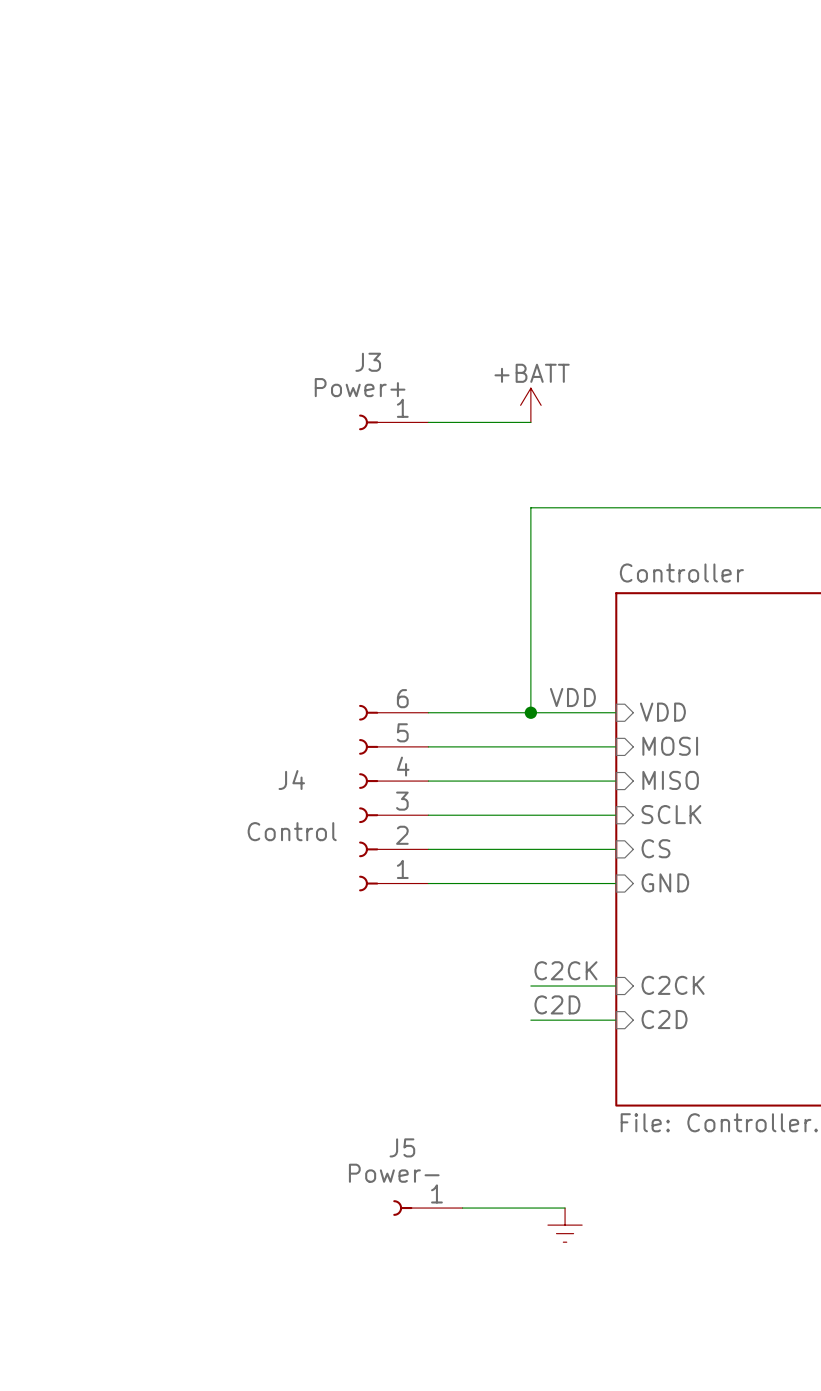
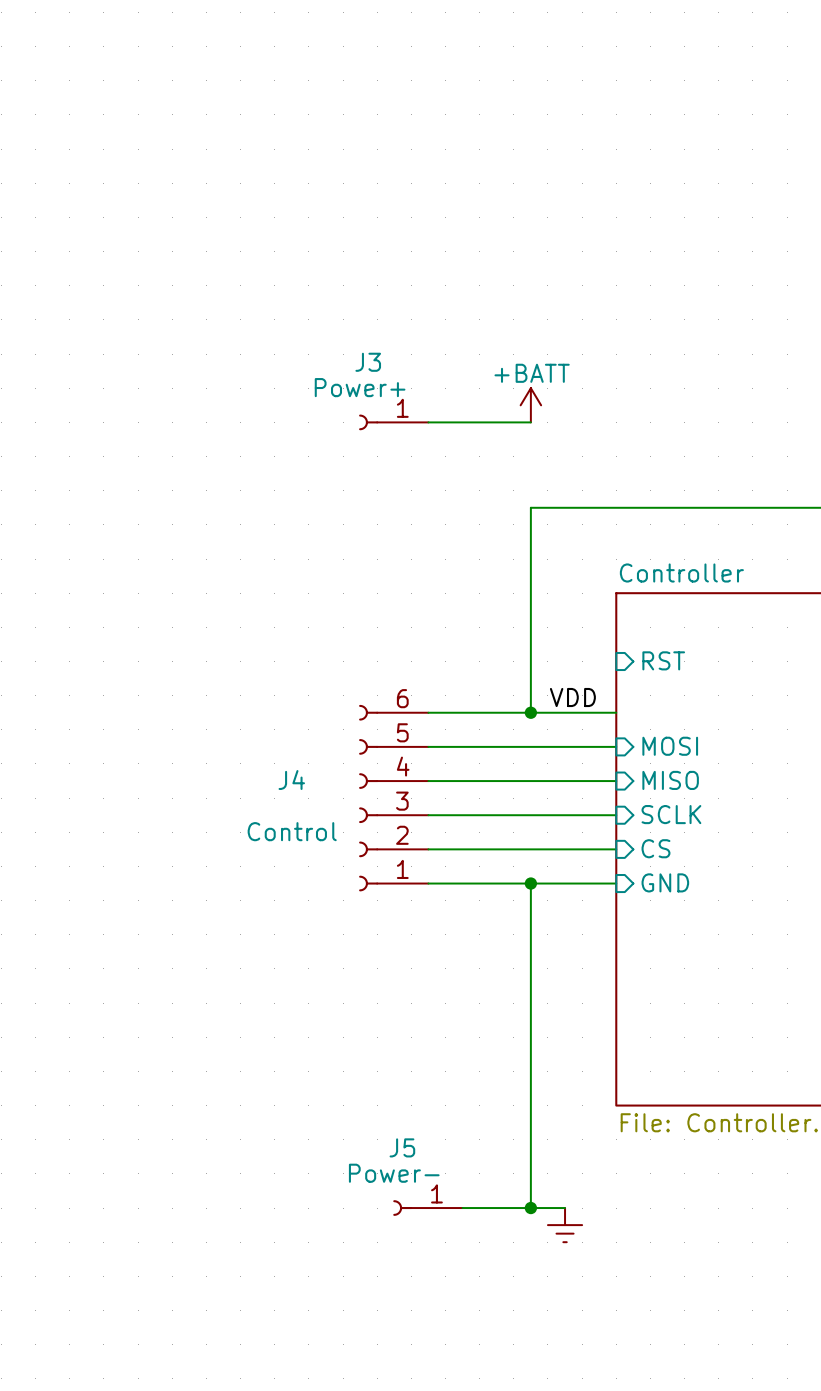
sheet pin: none -> RST (663, 660)
sheet pin: VDD (662, 712) -> none
wire: none -> (530, 883) (530, 1208)
junction: none -> (530, 883)
label: C2CK (565, 970) -> none
sheet pin: C2CK (673, 985) -> none
wire: (530, 986) (616, 986) -> none
label: C2D (557, 1004) -> none
sheet pin: C2D (664, 1019) -> none
wire: (530, 1020) (616, 1020) -> none
junction: none -> (530, 1208)

